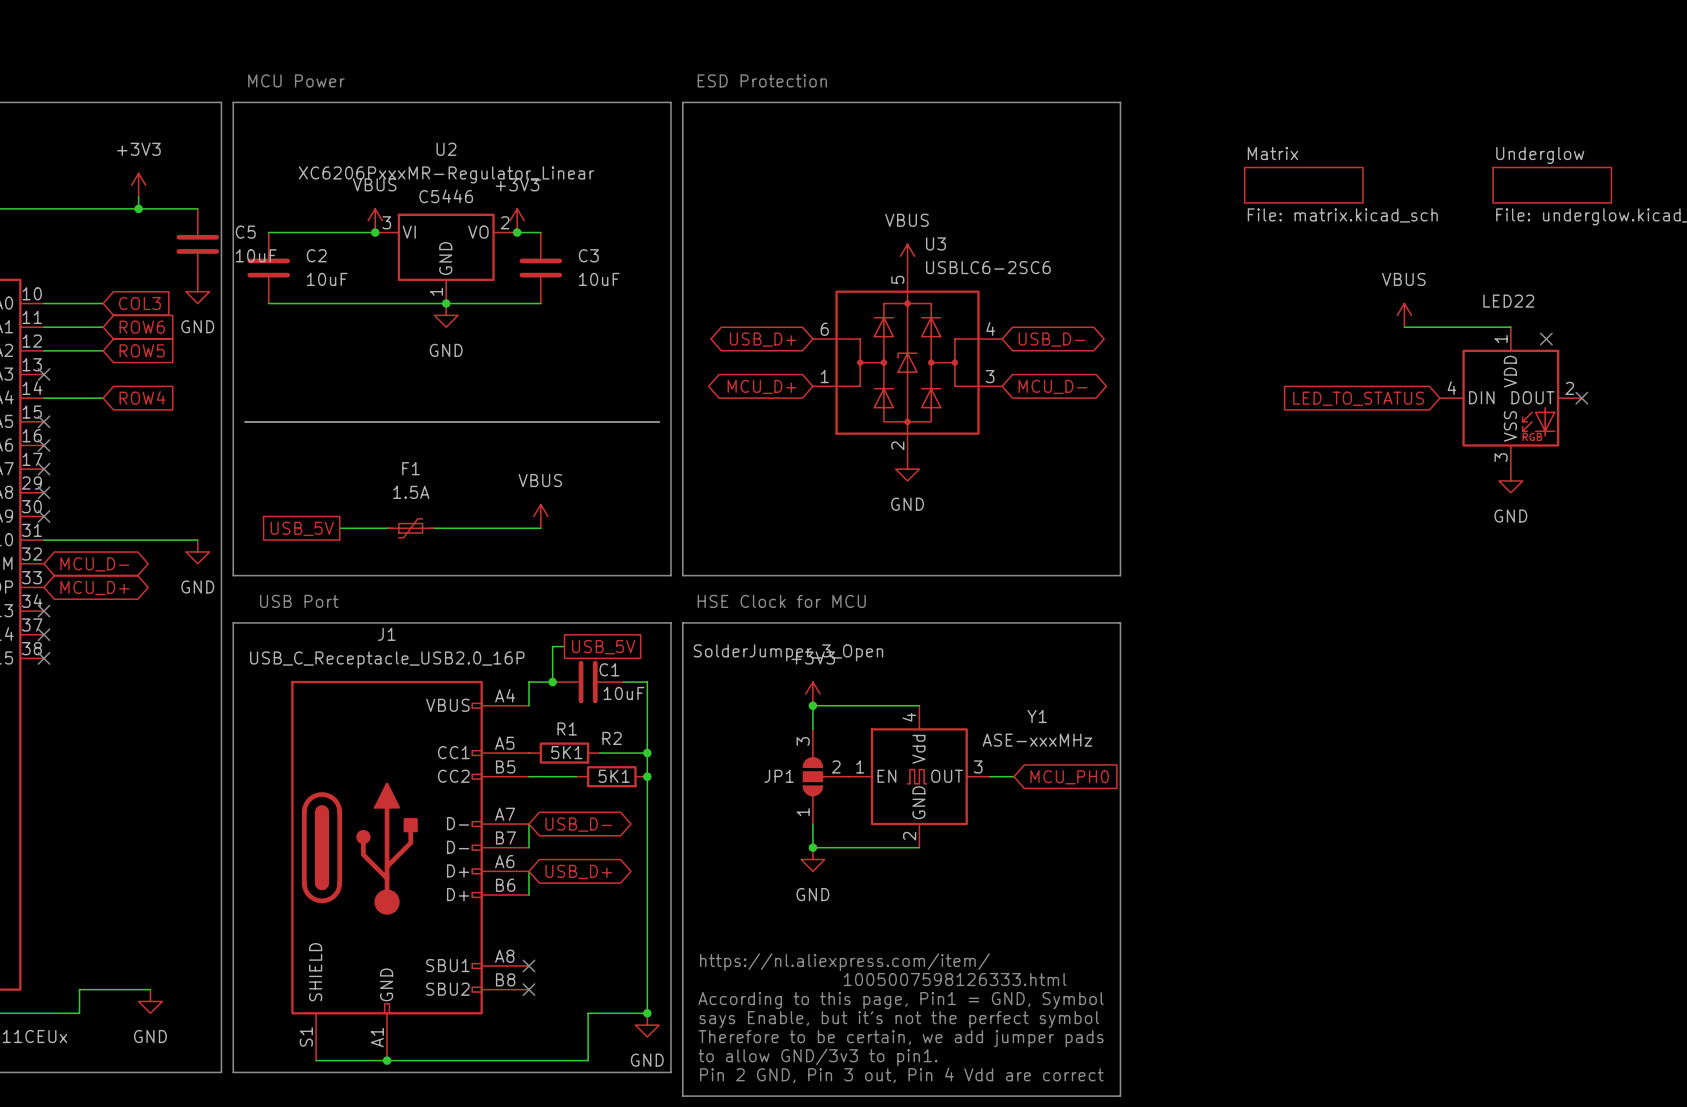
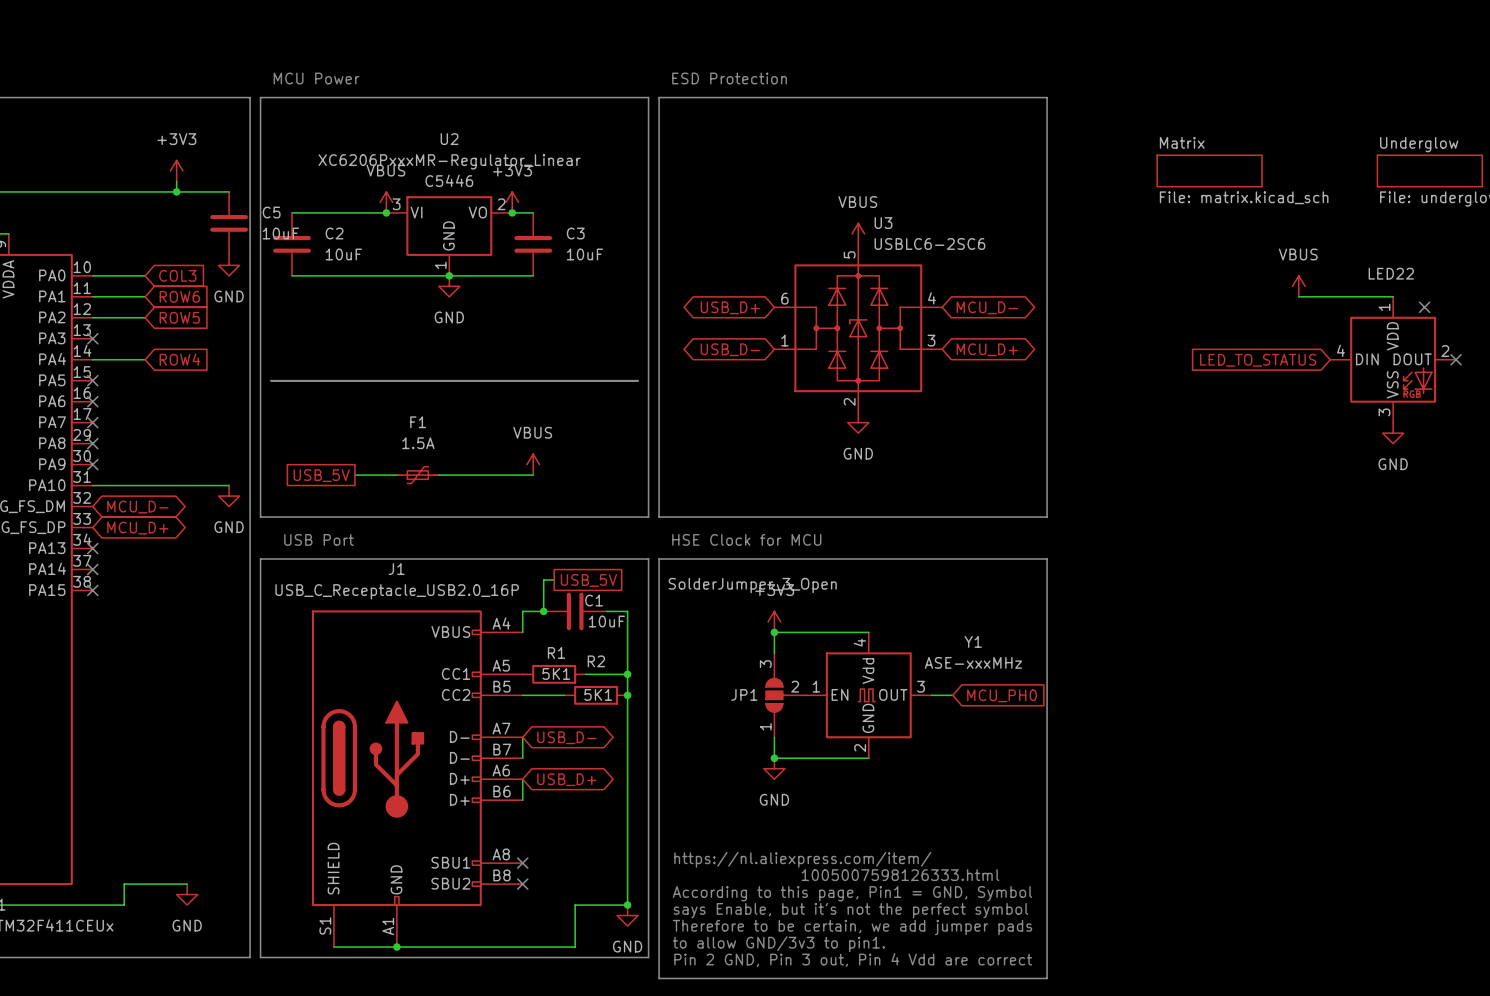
global label: USB_D- (1051, 339) -> MCU_D- (987, 307)
global label: MCU_D+ (762, 386) -> USB_D- (730, 349)
global label: MCU_D- (1053, 386) -> MCU_D+ (987, 349)

